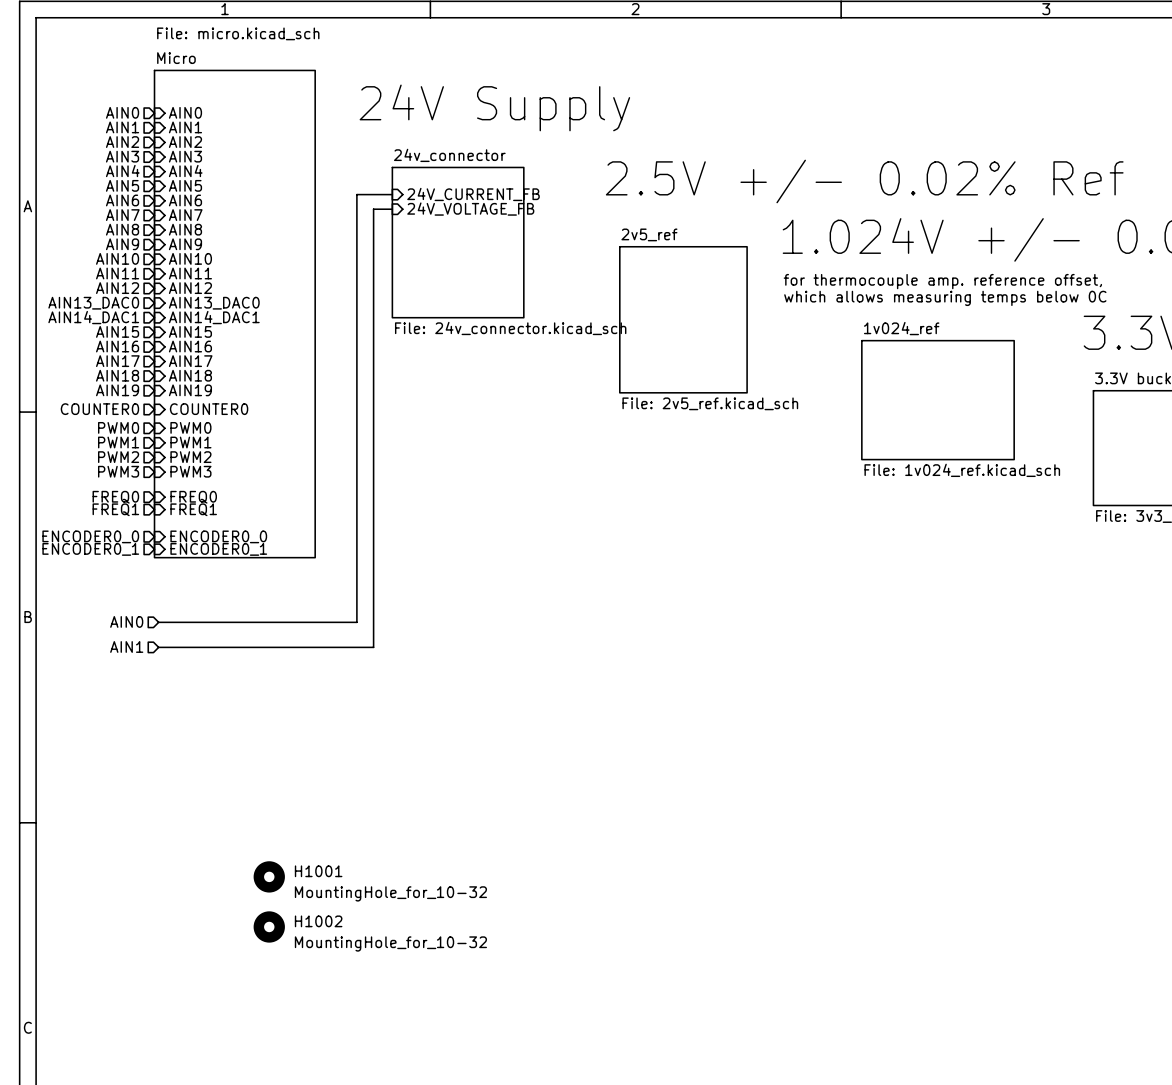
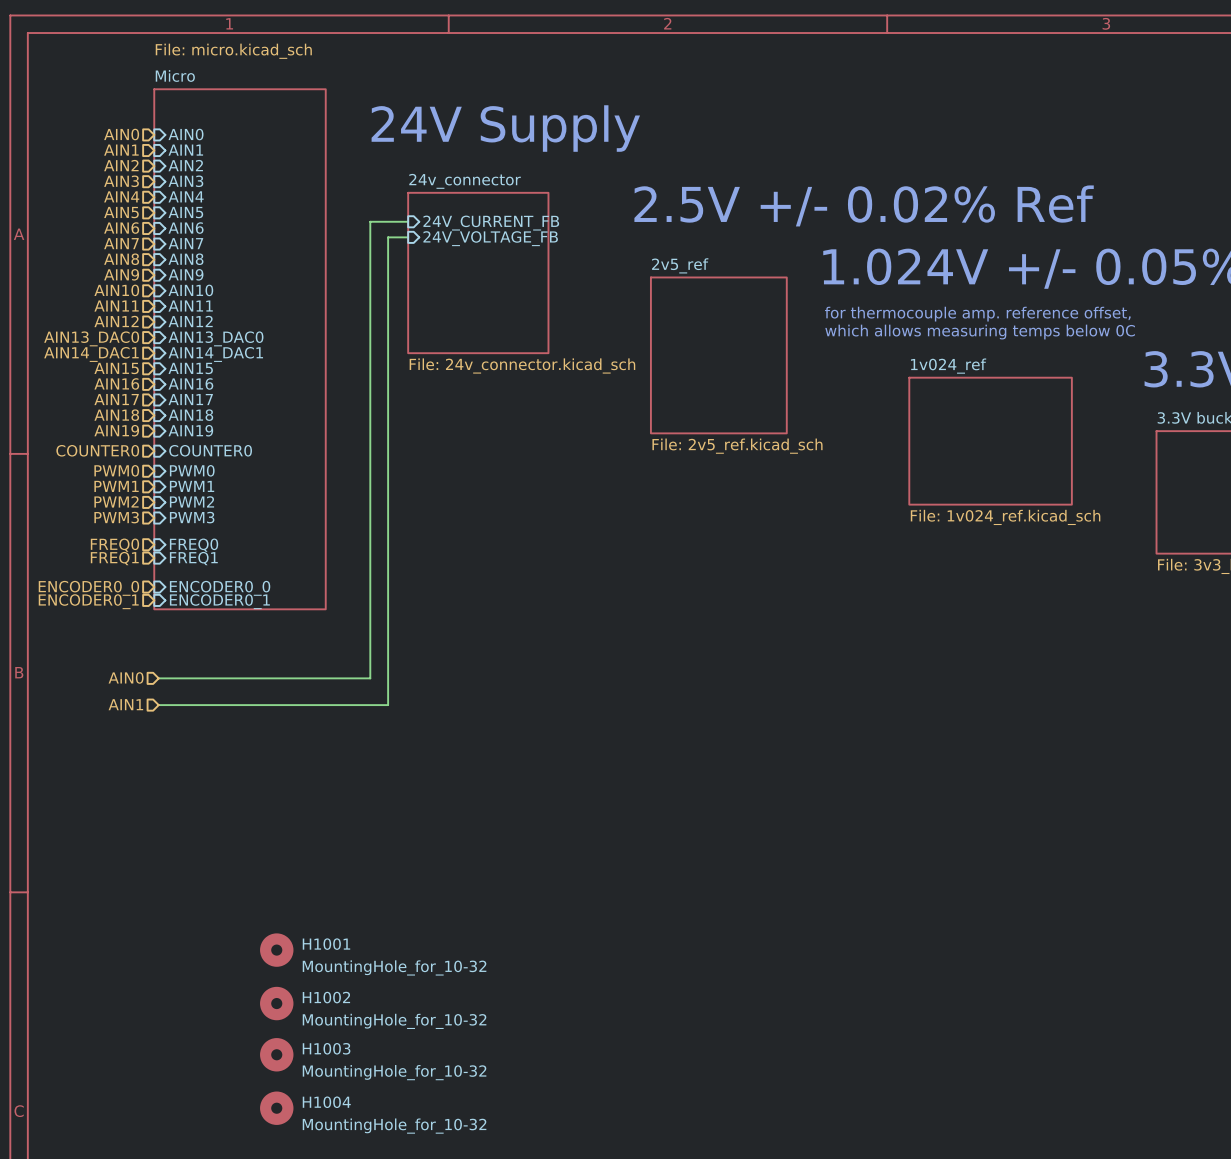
H1003: none -> MountingHole_for_10-32 (276, 1054)
H1004: none -> MountingHole_for_10-32 (276, 1108)

